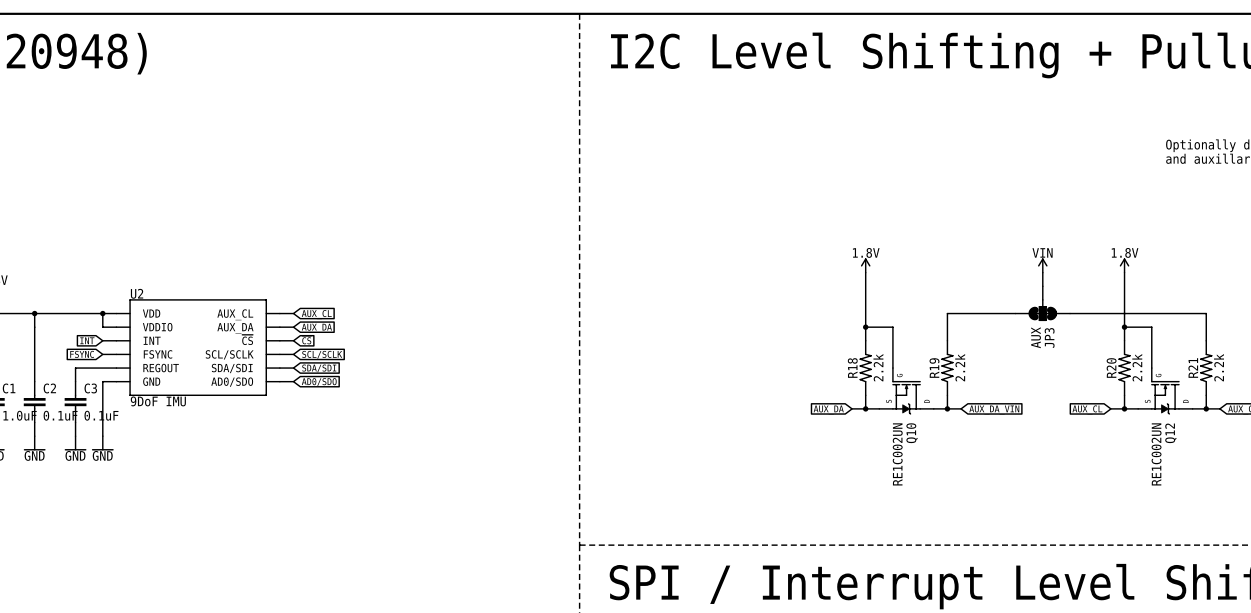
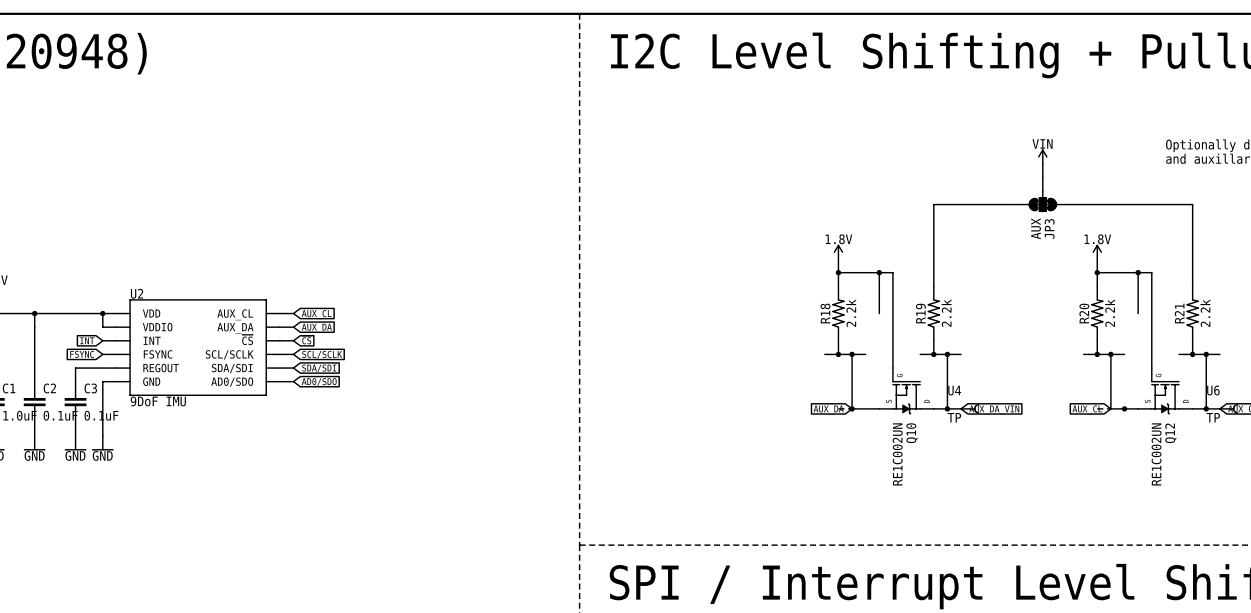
wire: none -> (1015, 204) (933, 204) (933, 286)
wire: none -> (1070, 204) (1192, 204) (1192, 286)
wire: none -> (838, 259) (838, 286)
wire: none -> (1097, 259) (1097, 286)
power symbol position: 1.8V (865, 265) -> 1.8V (838, 251)
power symbol position: VIN (1042, 265) -> VIN (1042, 156)
power symbol position: 1.8V (1124, 265) -> 1.8V (1097, 251)
junction: none -> (838, 272)
wire: (865, 272) (865, 340) -> none
wire: none -> (879, 272) (879, 313)
junction: none -> (879, 272)
wire: (1042, 272) (1042, 286) -> (1042, 163) (1042, 177)
junction: none -> (1097, 272)
wire: (1124, 272) (1124, 340) -> none
wire: none -> (1138, 272) (1138, 313)
junction: none -> (1138, 272)
JP3 position: (1042, 303) -> (1042, 194)
wire: (1015, 313) (947, 313) (947, 340) -> none
wire: (1070, 313) (1206, 313) (1206, 340) -> none
wire: (865, 327) (892, 327) -> (838, 272) (892, 272) (892, 327)
junction: (865, 327) -> none
wire: (1124, 327) (1151, 327) -> (1097, 272) (1151, 272) (1151, 327)
junction: (1124, 327) -> none
wire: none -> (933, 340) (933, 354)
wire: none -> (1192, 340) (1192, 354)
wire: none -> (824, 354) (865, 354)
junction: none -> (838, 354)
wire: none -> (852, 354) (852, 408) (838, 408)
junction: none -> (852, 354)
wire: none -> (920, 354) (961, 354)
junction: none -> (933, 354)
junction: none -> (947, 354)
wire: none -> (1083, 354) (1124, 354)
junction: none -> (1097, 354)
wire: none -> (1110, 354) (1110, 408) (1097, 408)
junction: none -> (1110, 354)
wire: none -> (1179, 354) (1219, 354)
junction: none -> (1192, 354)
junction: none -> (1206, 354)
R18 position: (865, 368) -> (838, 313)
R19 position: (947, 368) -> (933, 313)
R20 position: (1124, 368) -> (1097, 313)
R21 position: (1206, 368) -> (1192, 313)
wire: (865, 395) (865, 408) -> (838, 340) (838, 354)
wire: (1124, 395) (1124, 408) -> (1097, 340) (1097, 354)
junction position: (865, 408) -> (852, 408)
U4: none -> TP (969, 408)
U6: none -> TP (1228, 408)

